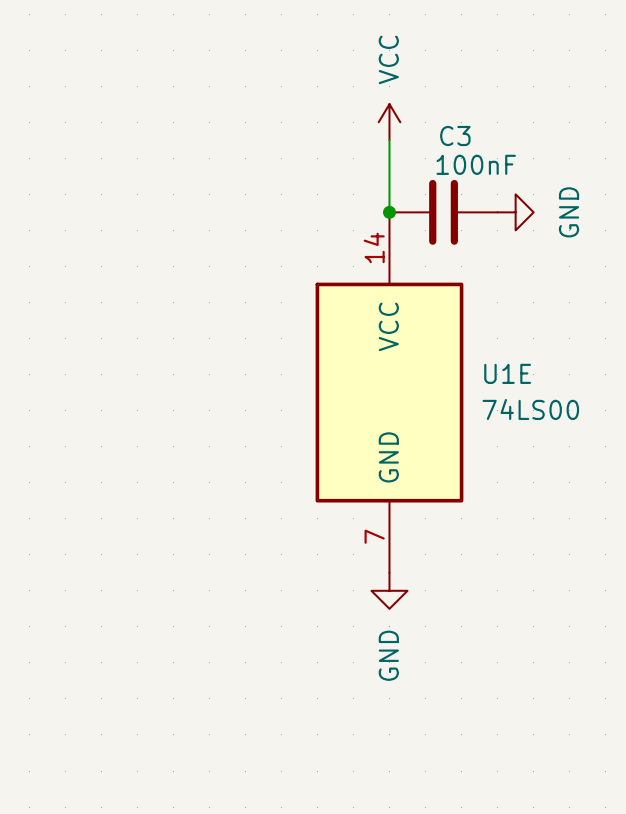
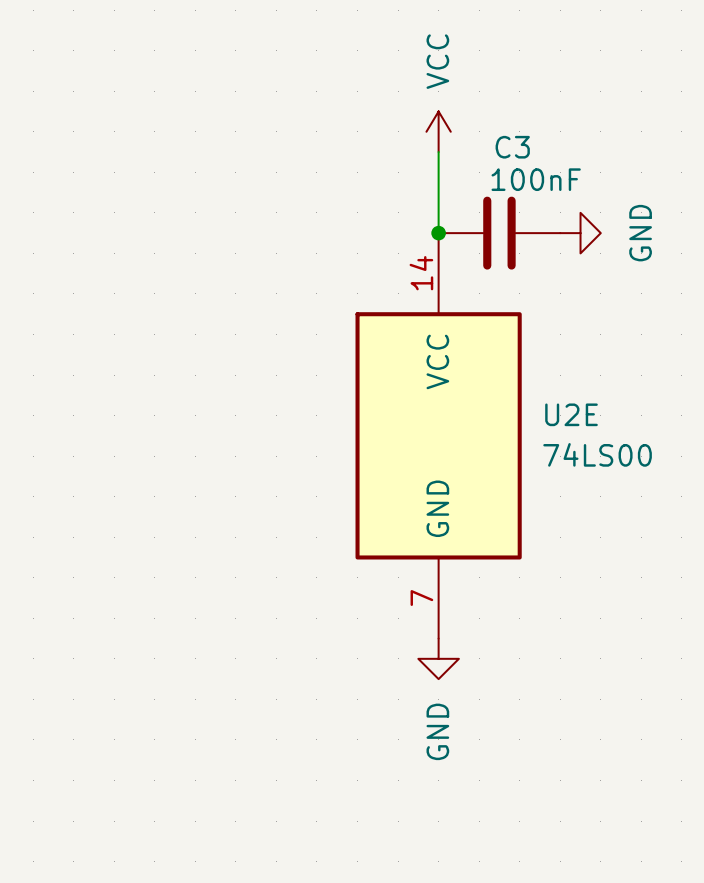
U1E name: U1E (507, 373) -> U2E (571, 414)

